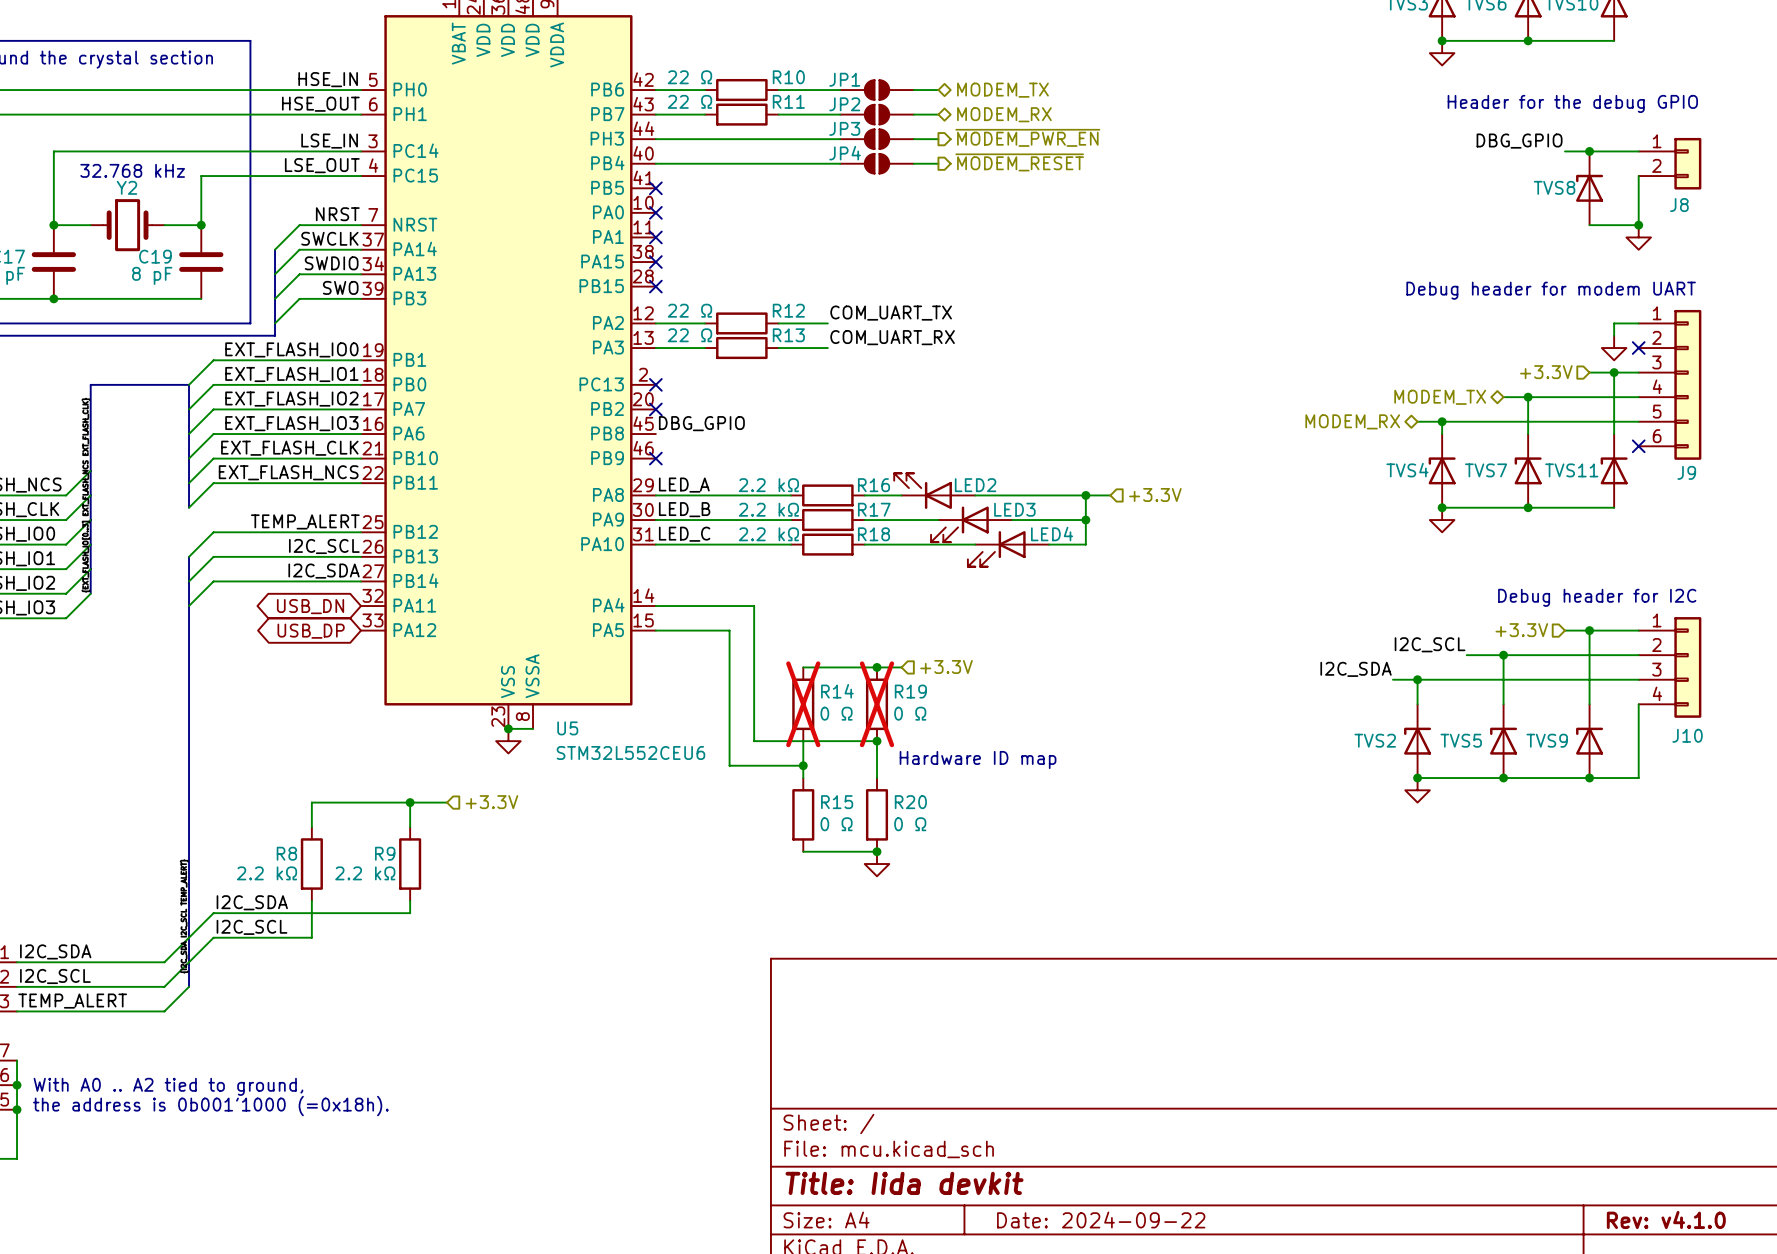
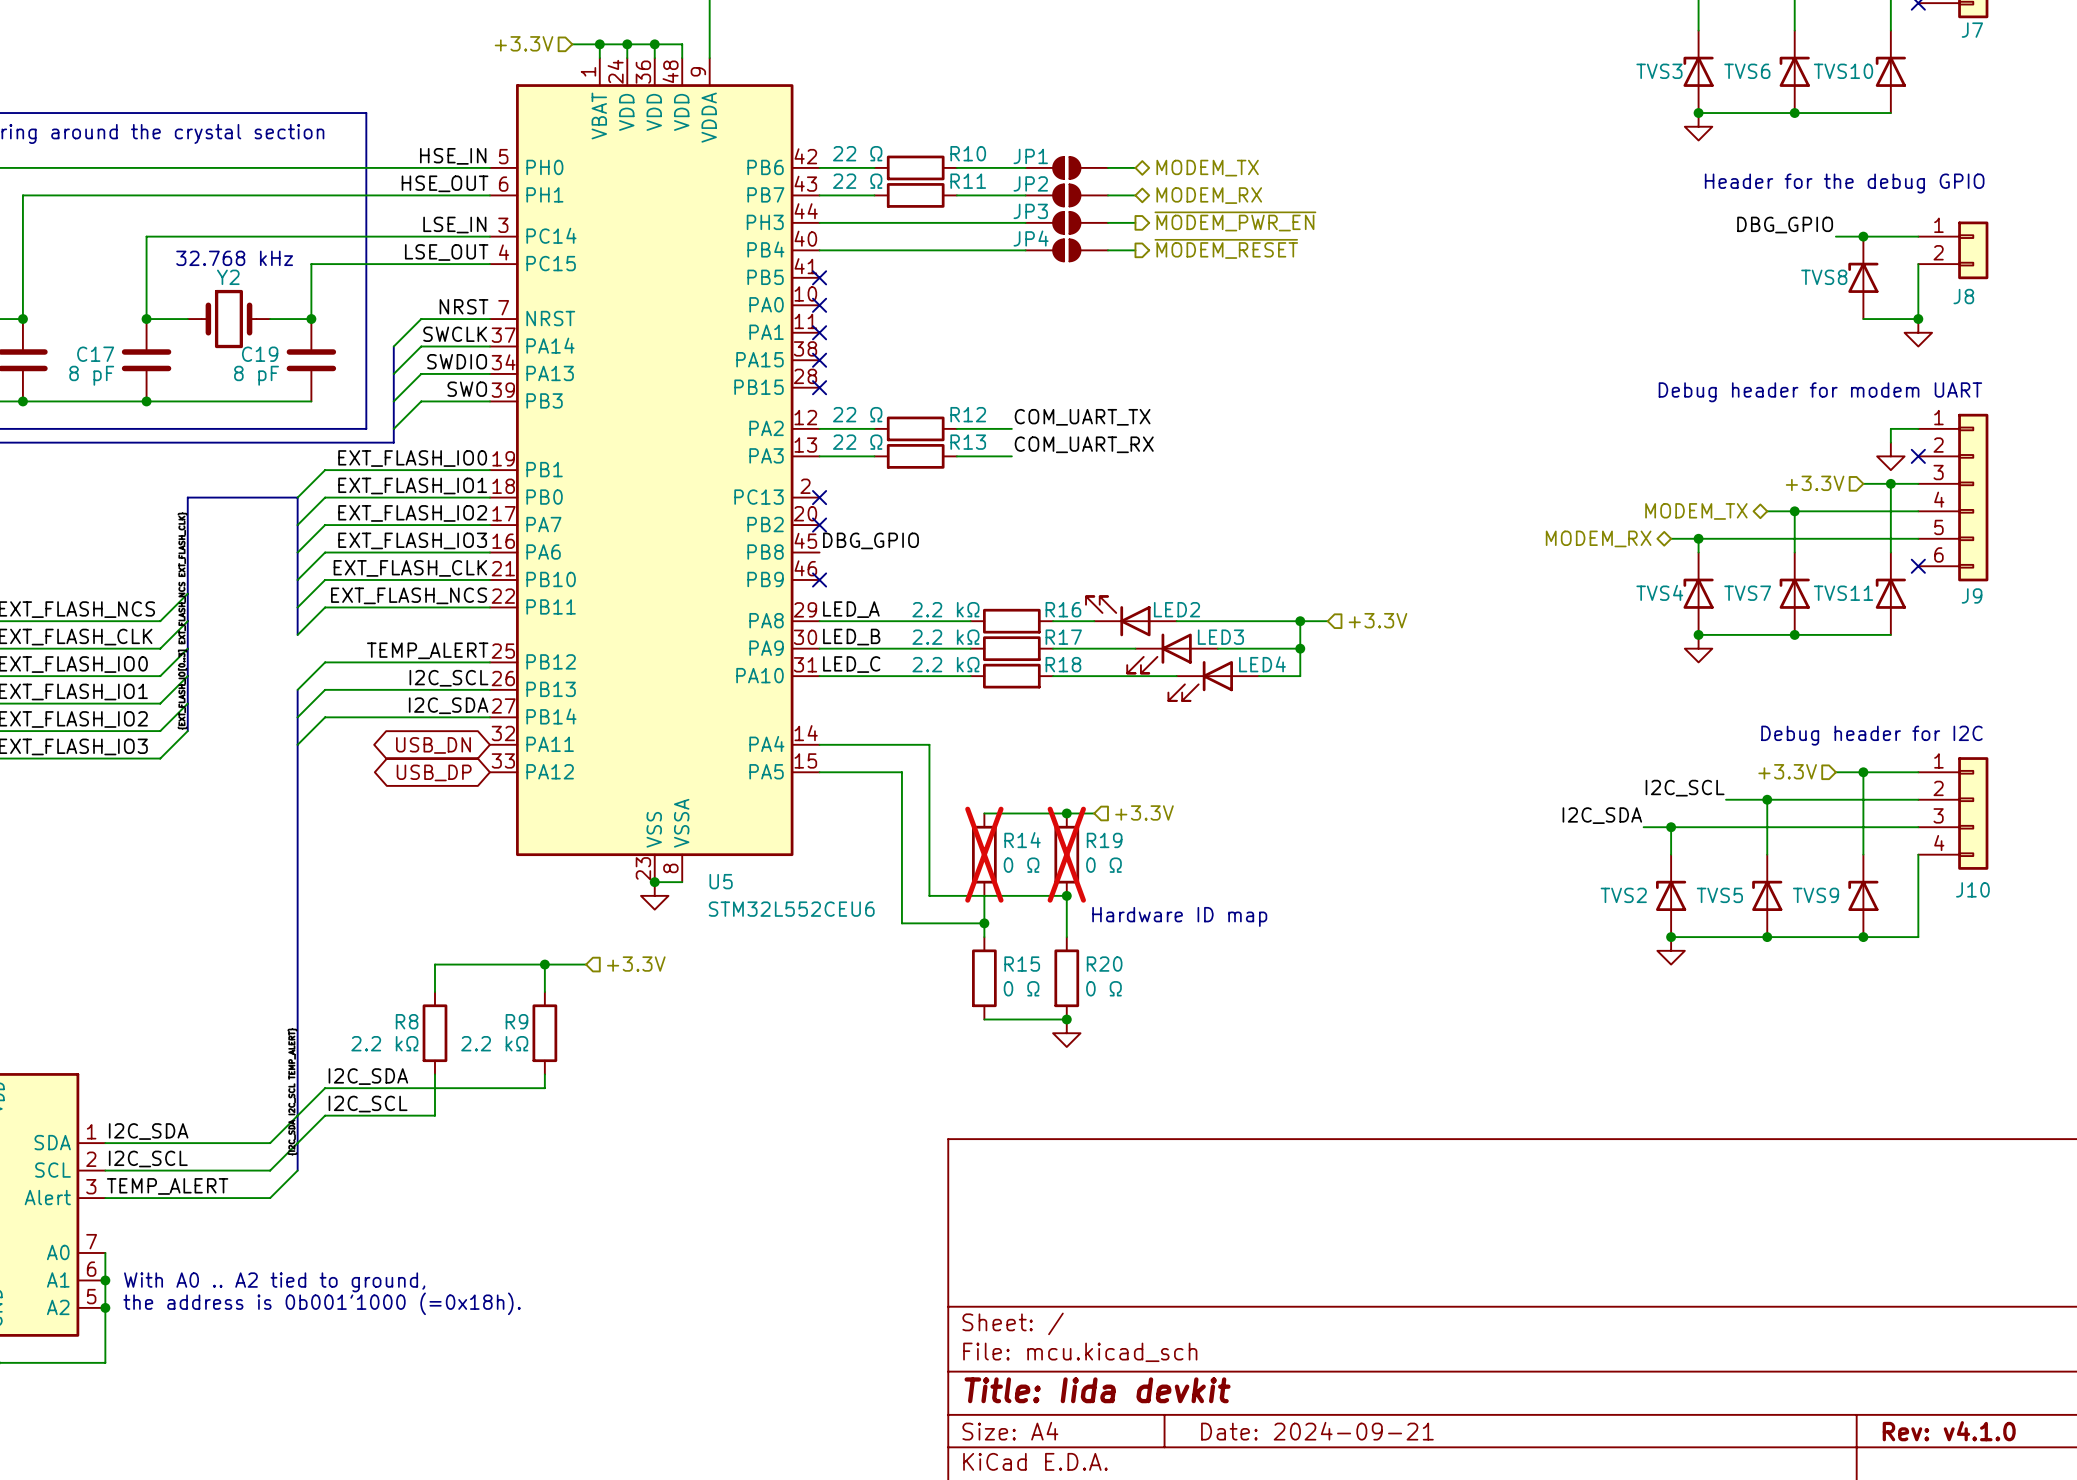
title block: Date: 2024-09-22 (1101, 1219) -> Date: 2024-09-21 (1317, 1431)

